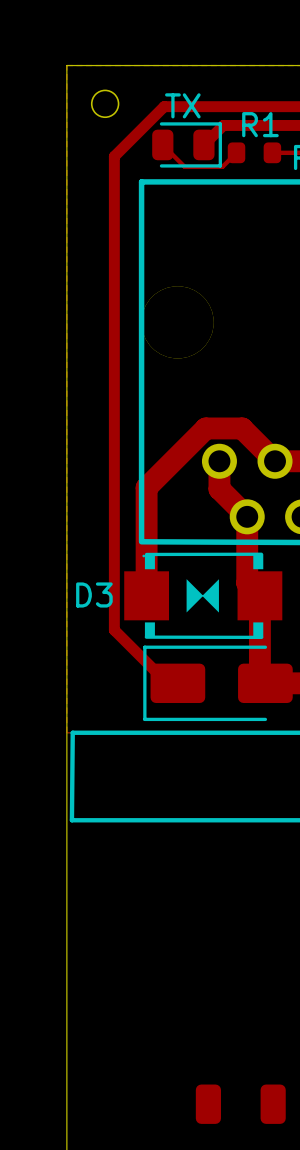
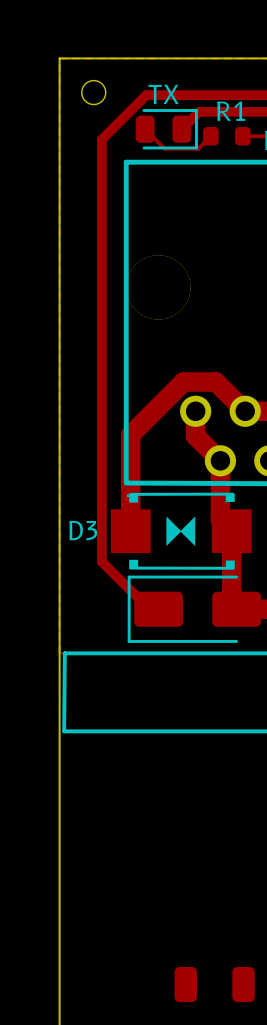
D3 footprint: [124, 552, 283, 640] -> [110, 492, 252, 570]

